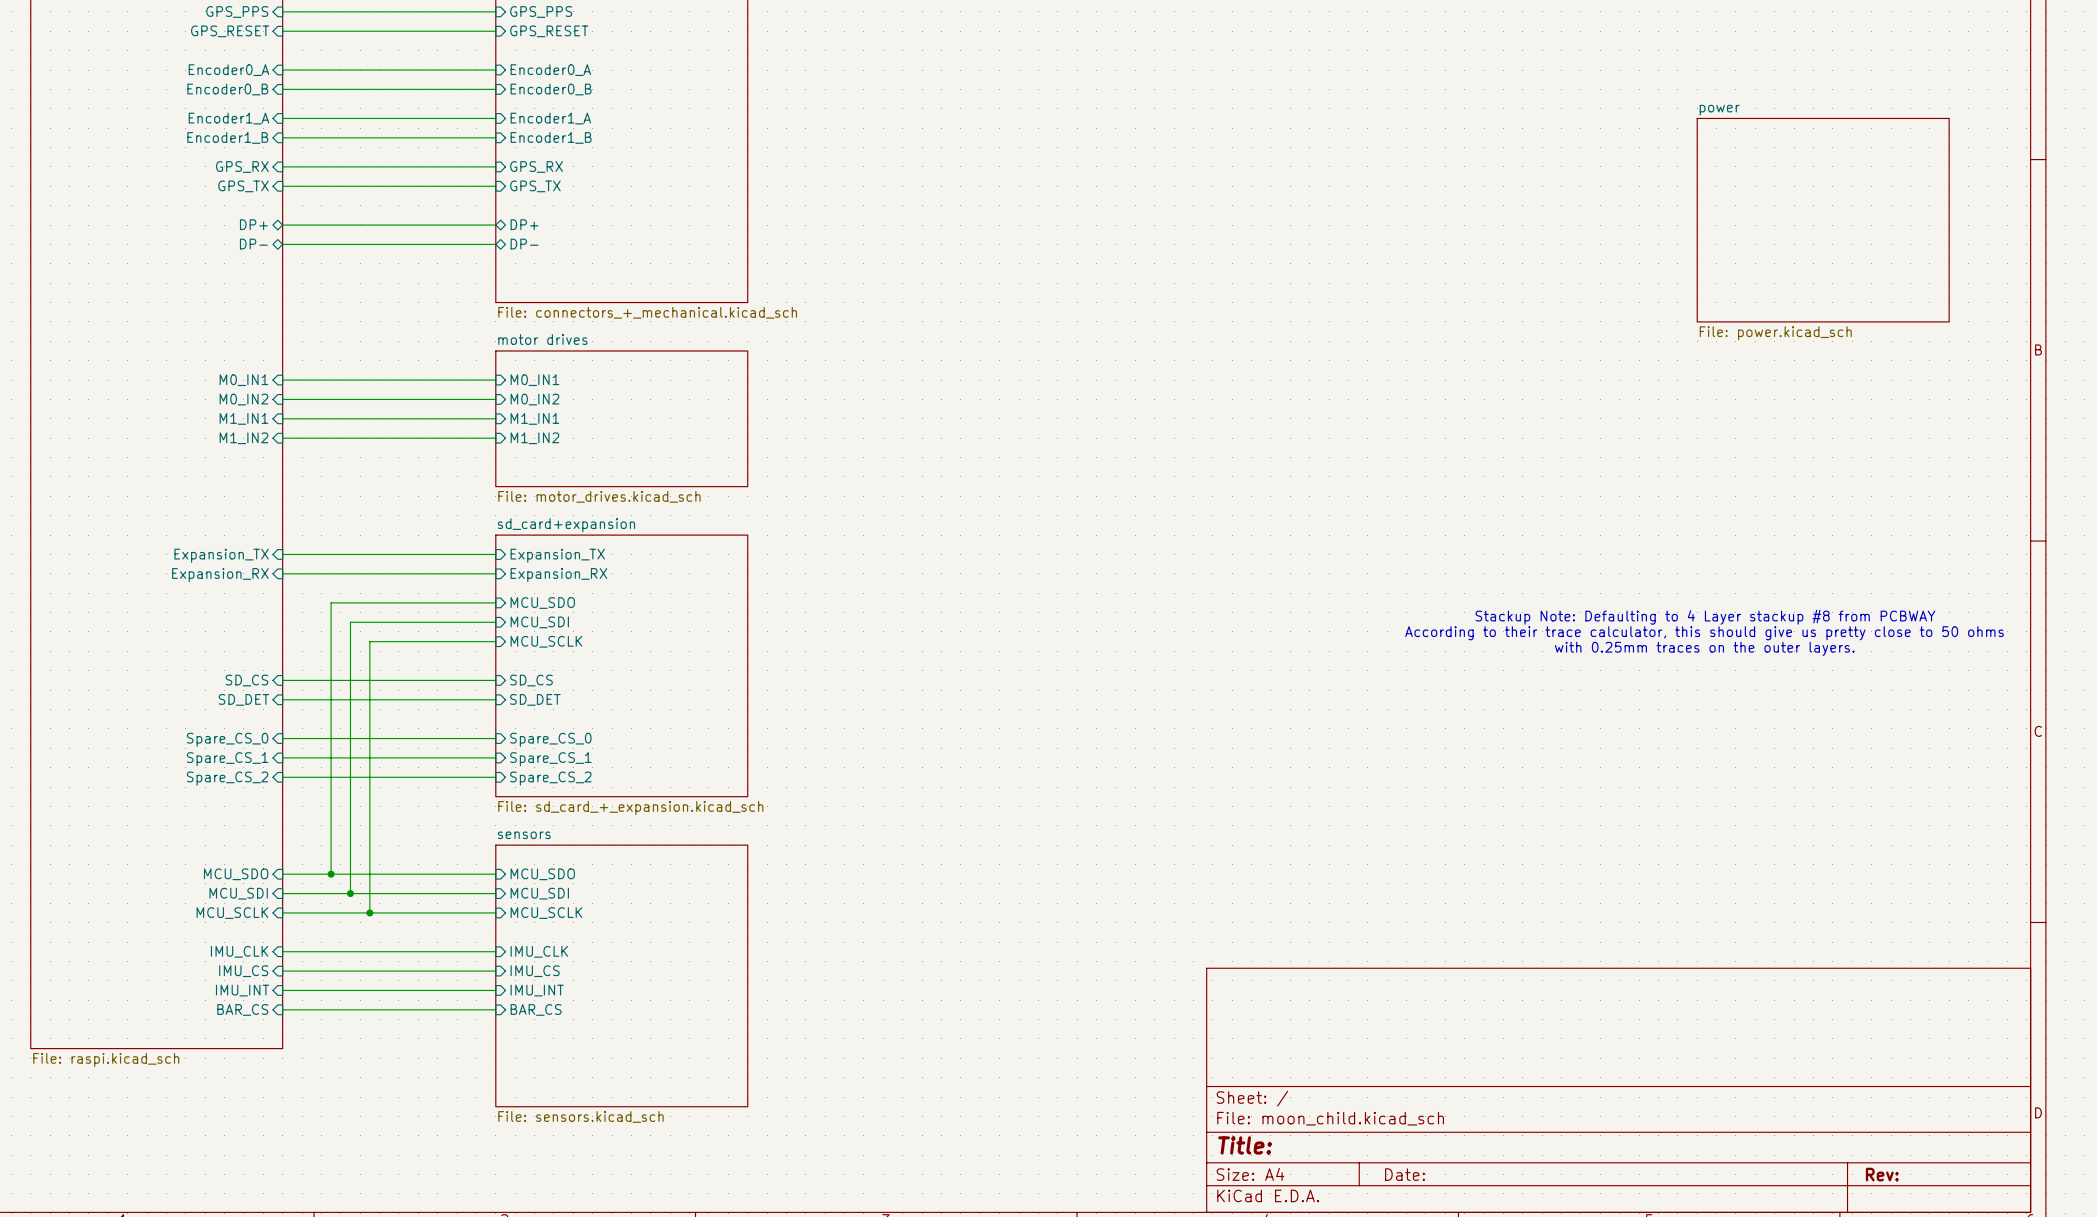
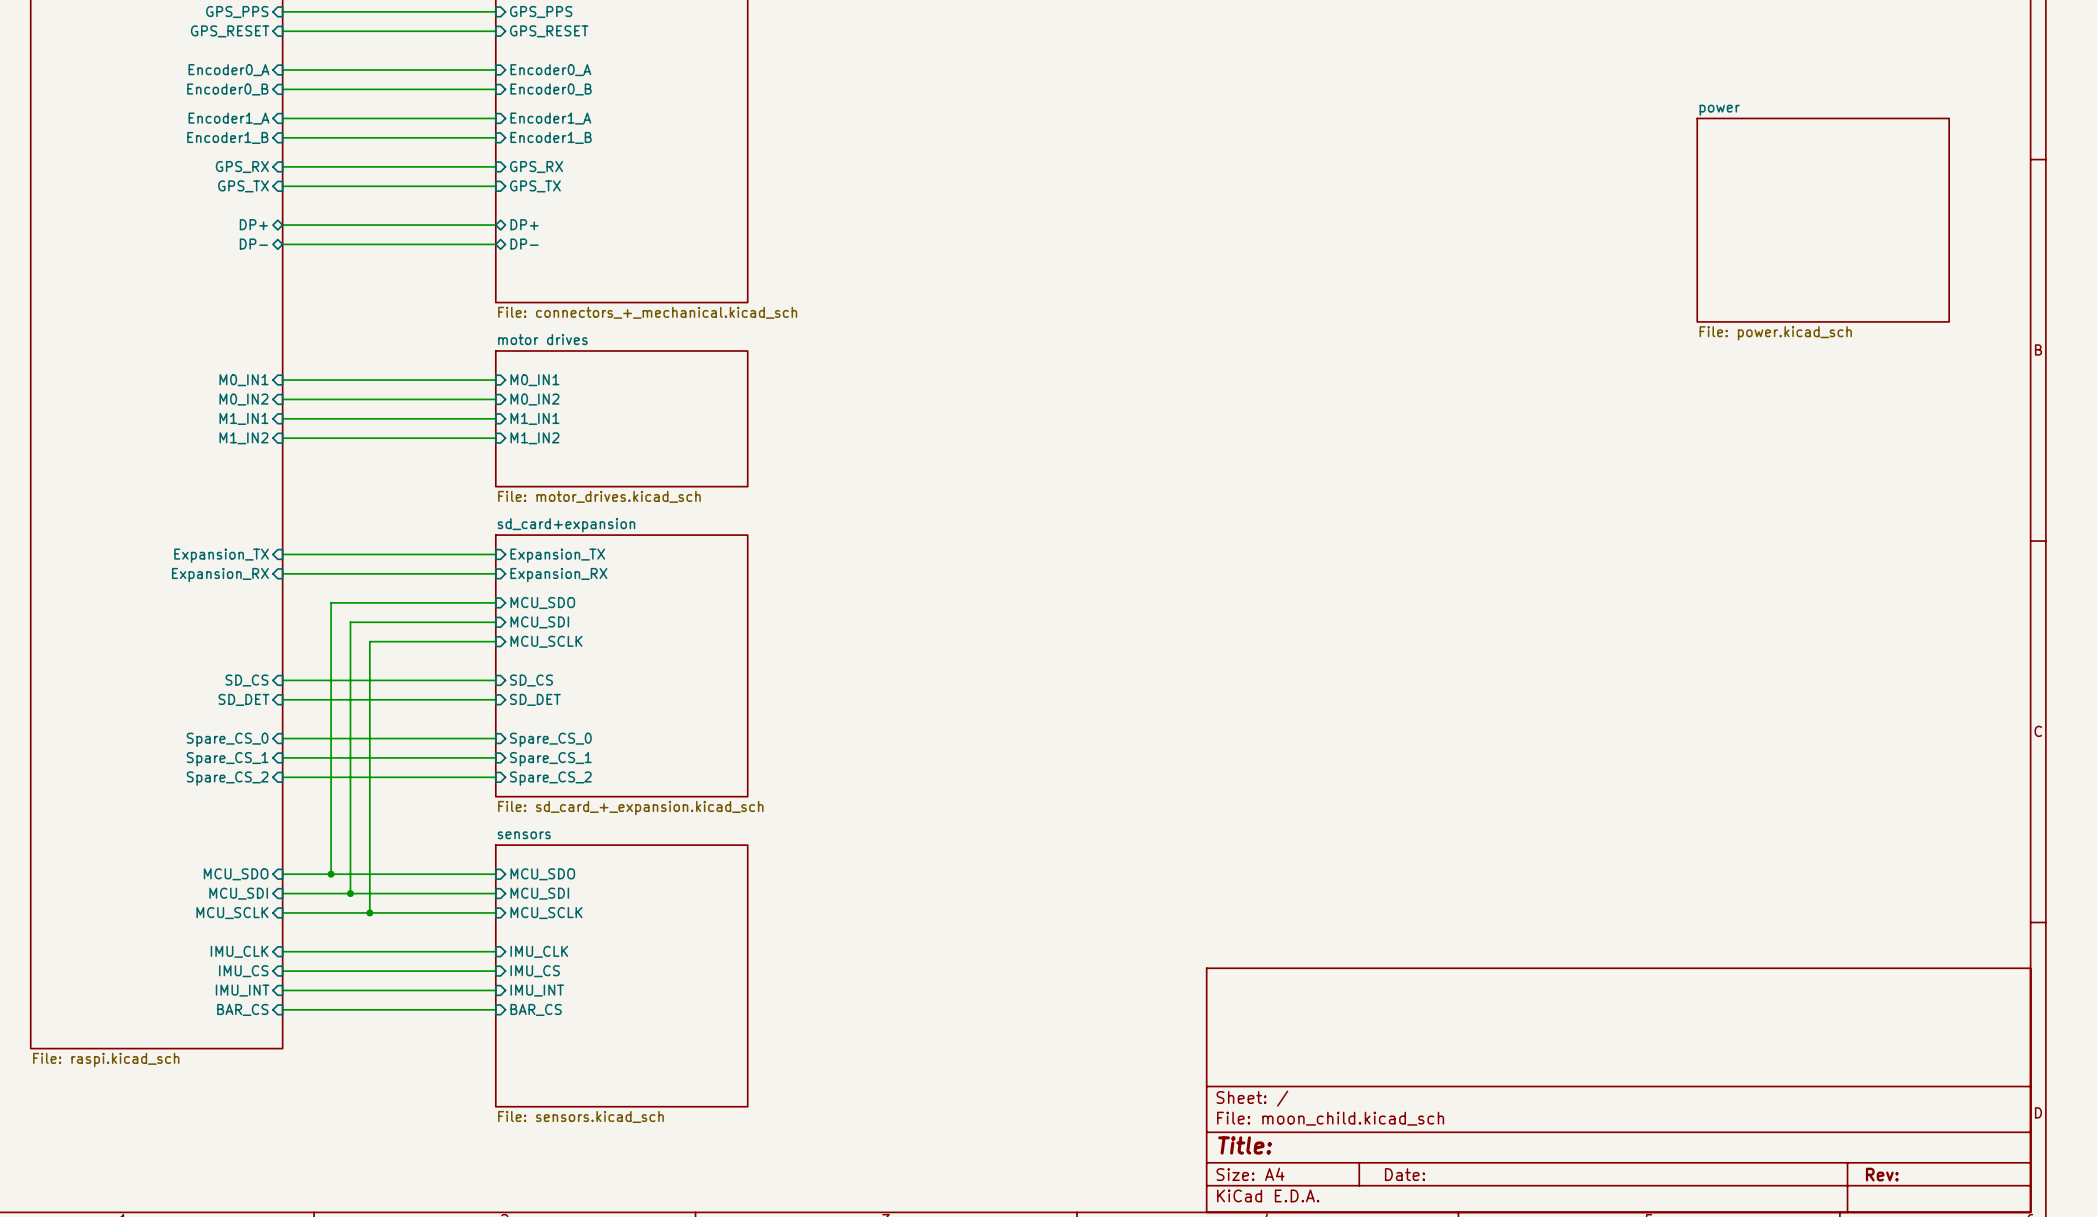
text: Stackup Note: Defaulting to 4 Layer stackup #8 from PCBWAY (1705, 617) -> none
text: According to their trace calculator, this should give us pretty close to 50 ohms (1704, 633) -> none
text: with 0.25mm traces on the outer layers. (1704, 648) -> none

